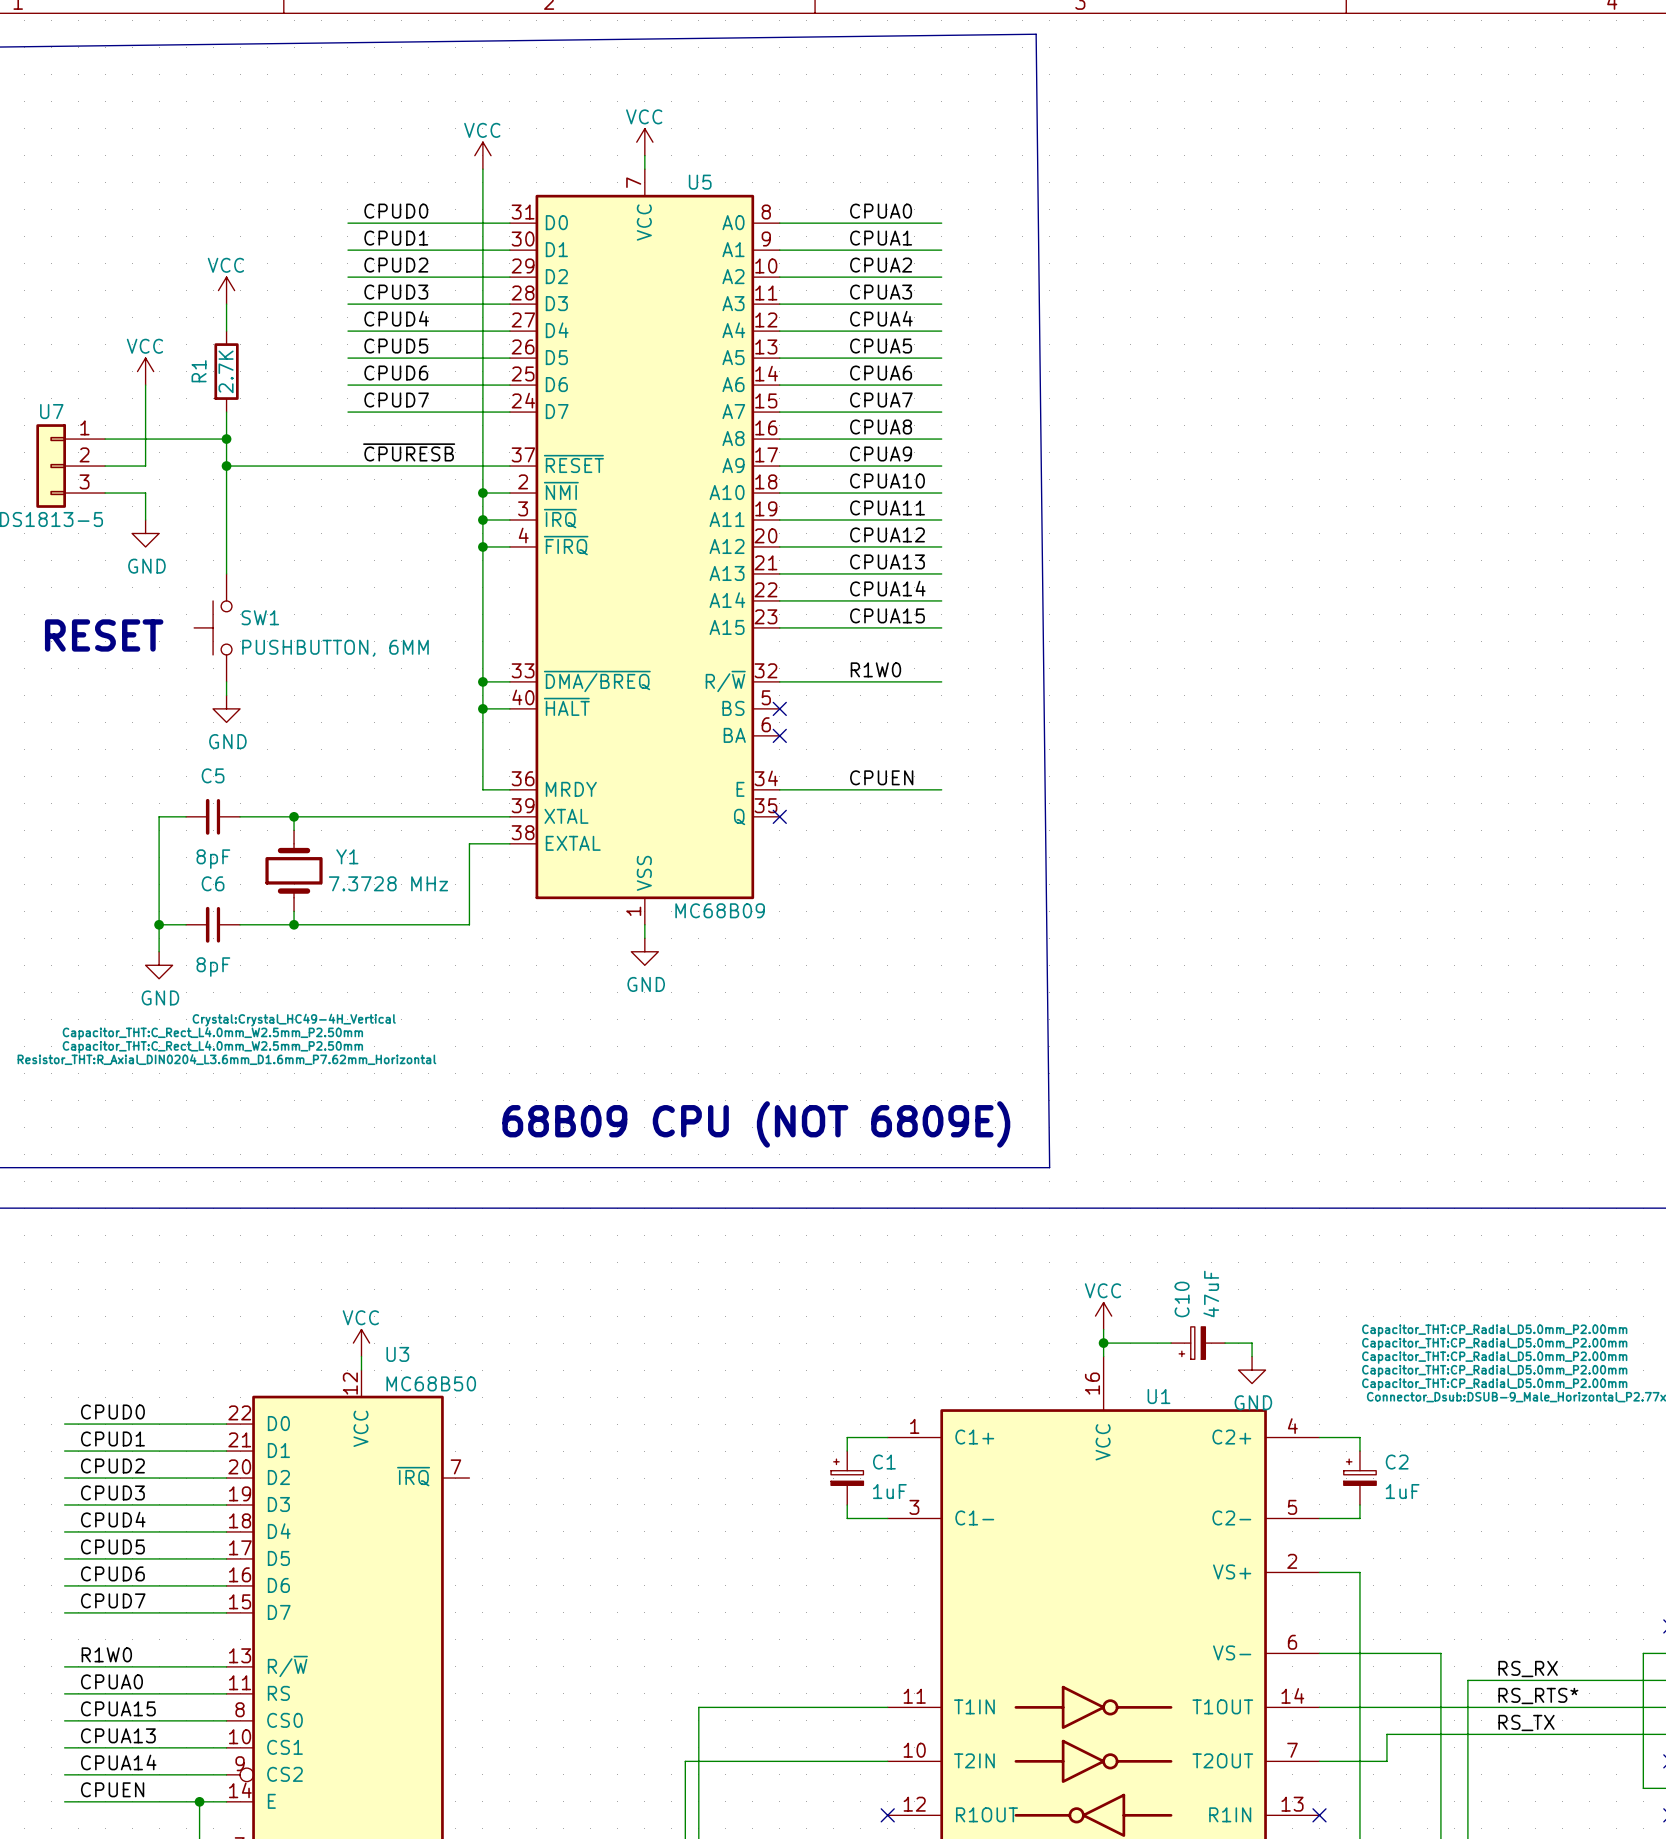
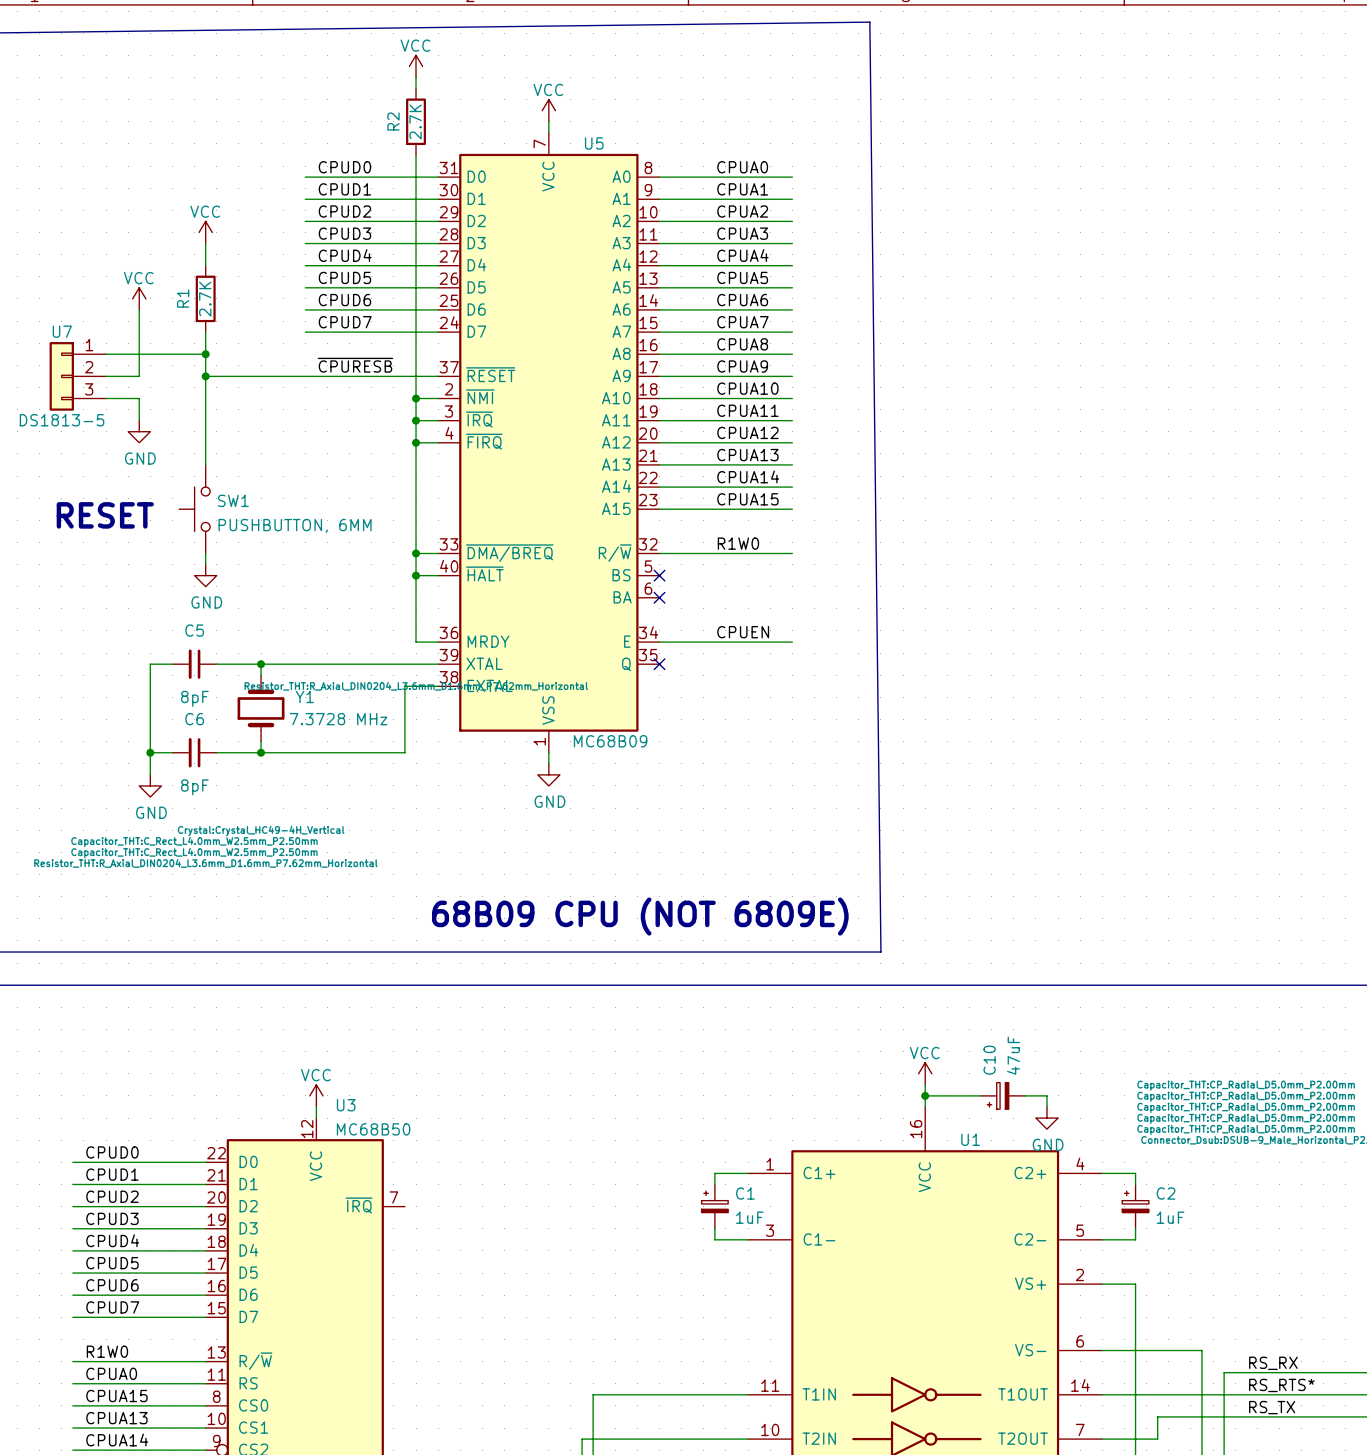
wire: none -> (416, 77) (416, 88)
R2: none -> 2.7K (416, 121)
power symbol position: VCC (482, 155) -> VCC (416, 66)

